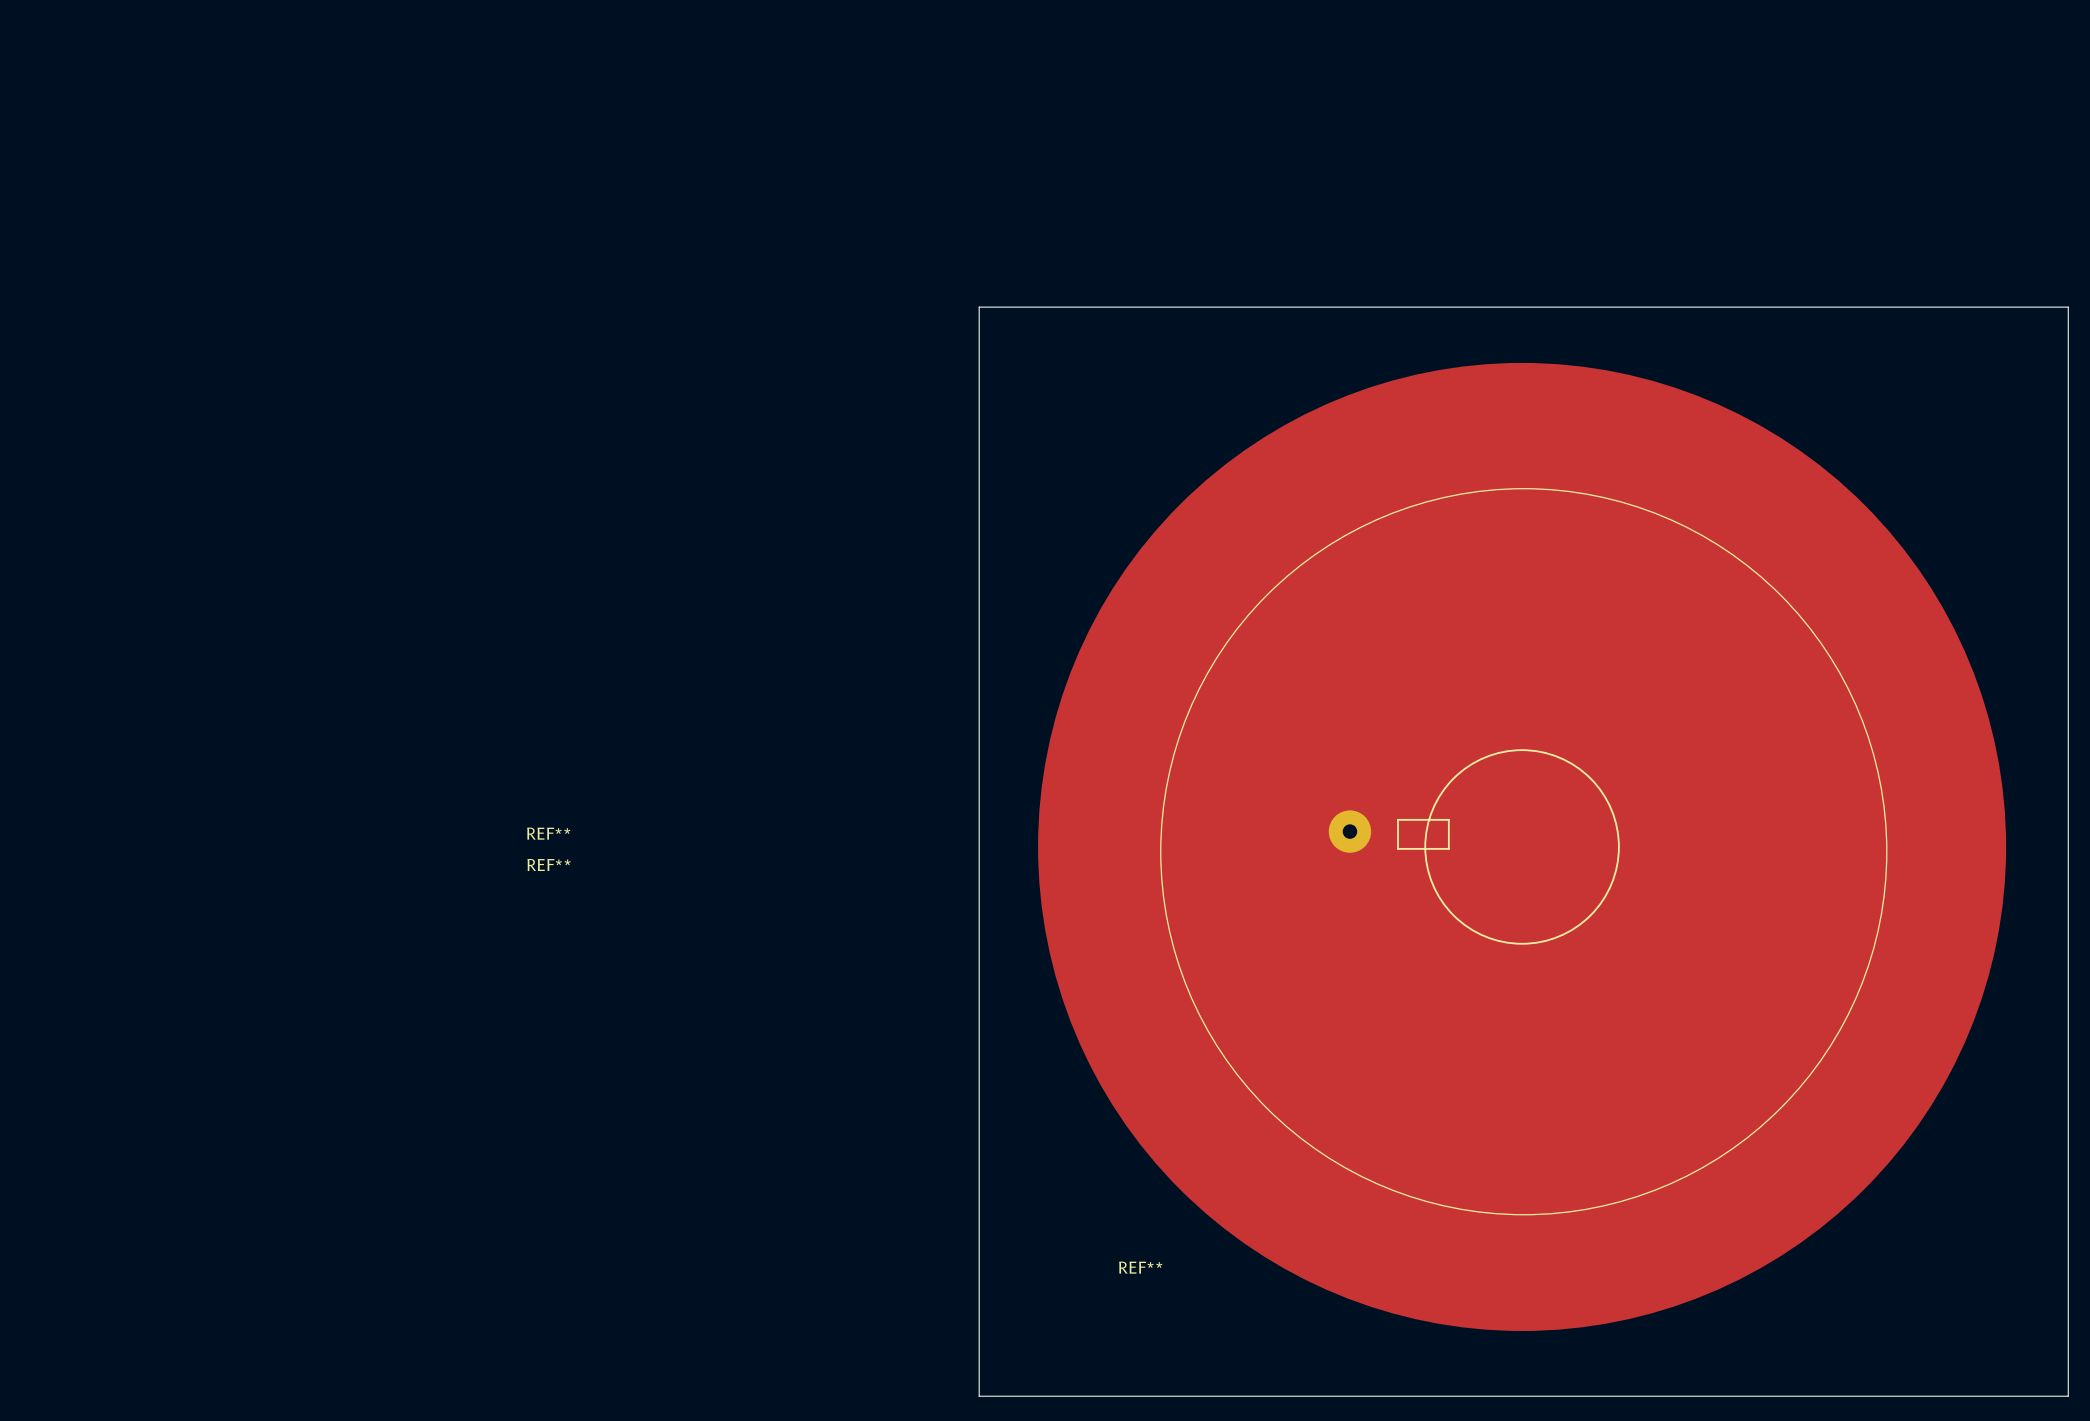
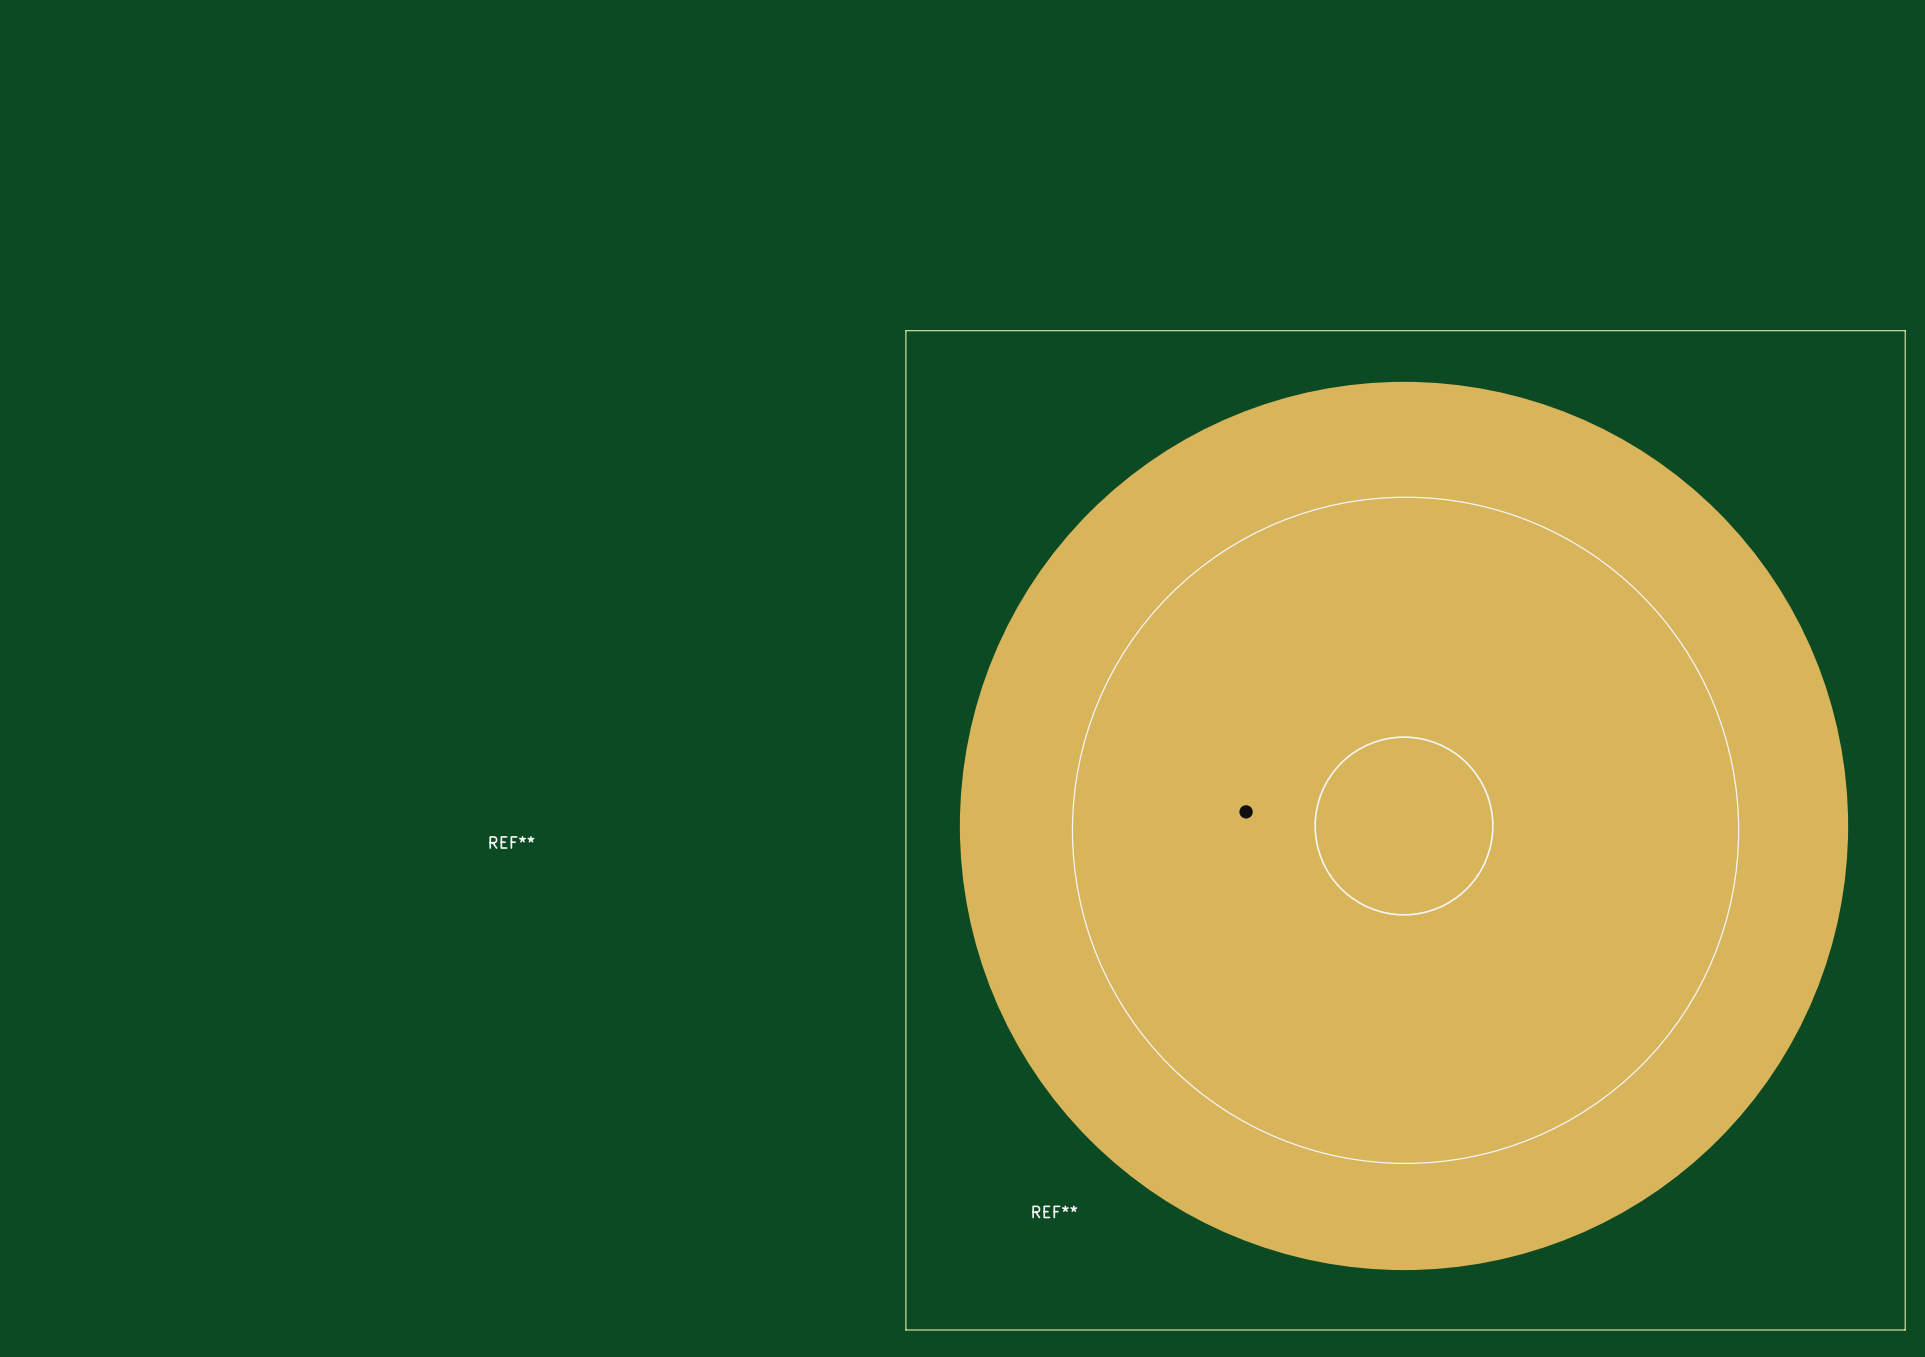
REF**: (1423, 834) -> none

